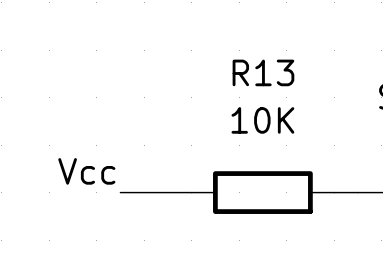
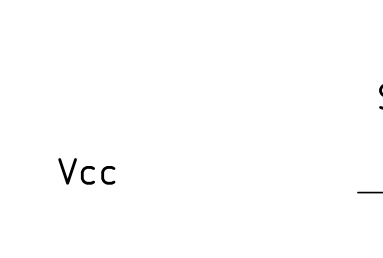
wire: (120, 192) (191, 192) -> none
R13: 10K (262, 192) -> none
wire: (334, 192) (357, 192) -> none

